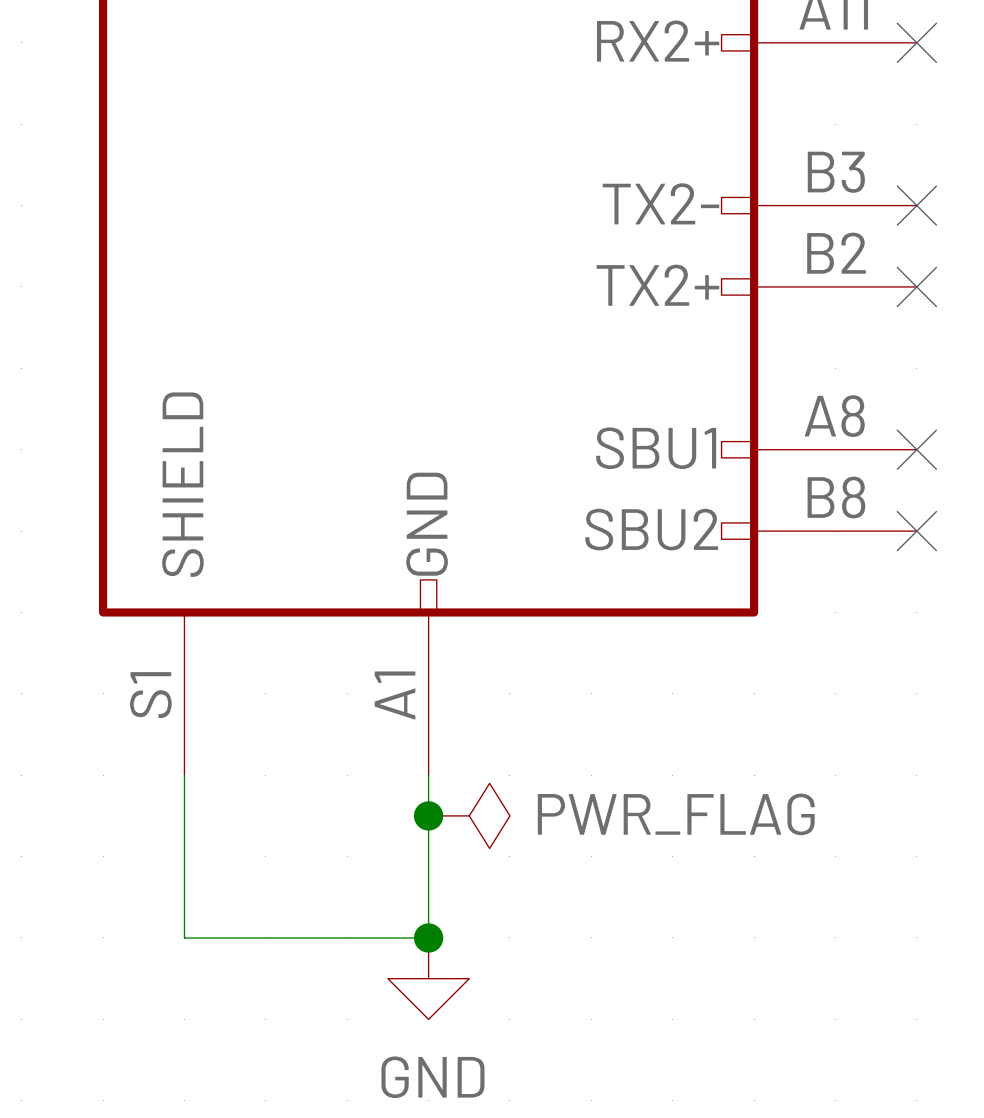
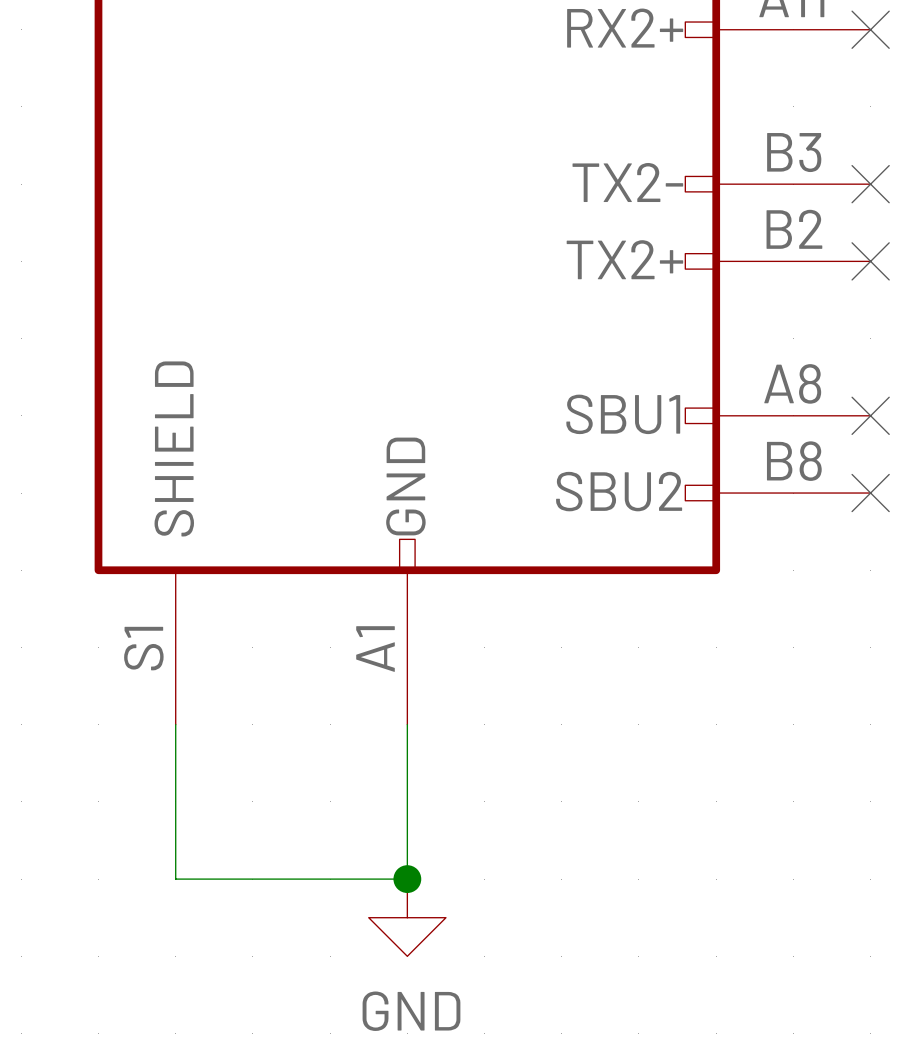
junction: (428, 815) -> none
power symbol: PWR_FLAG (469, 815) -> none

